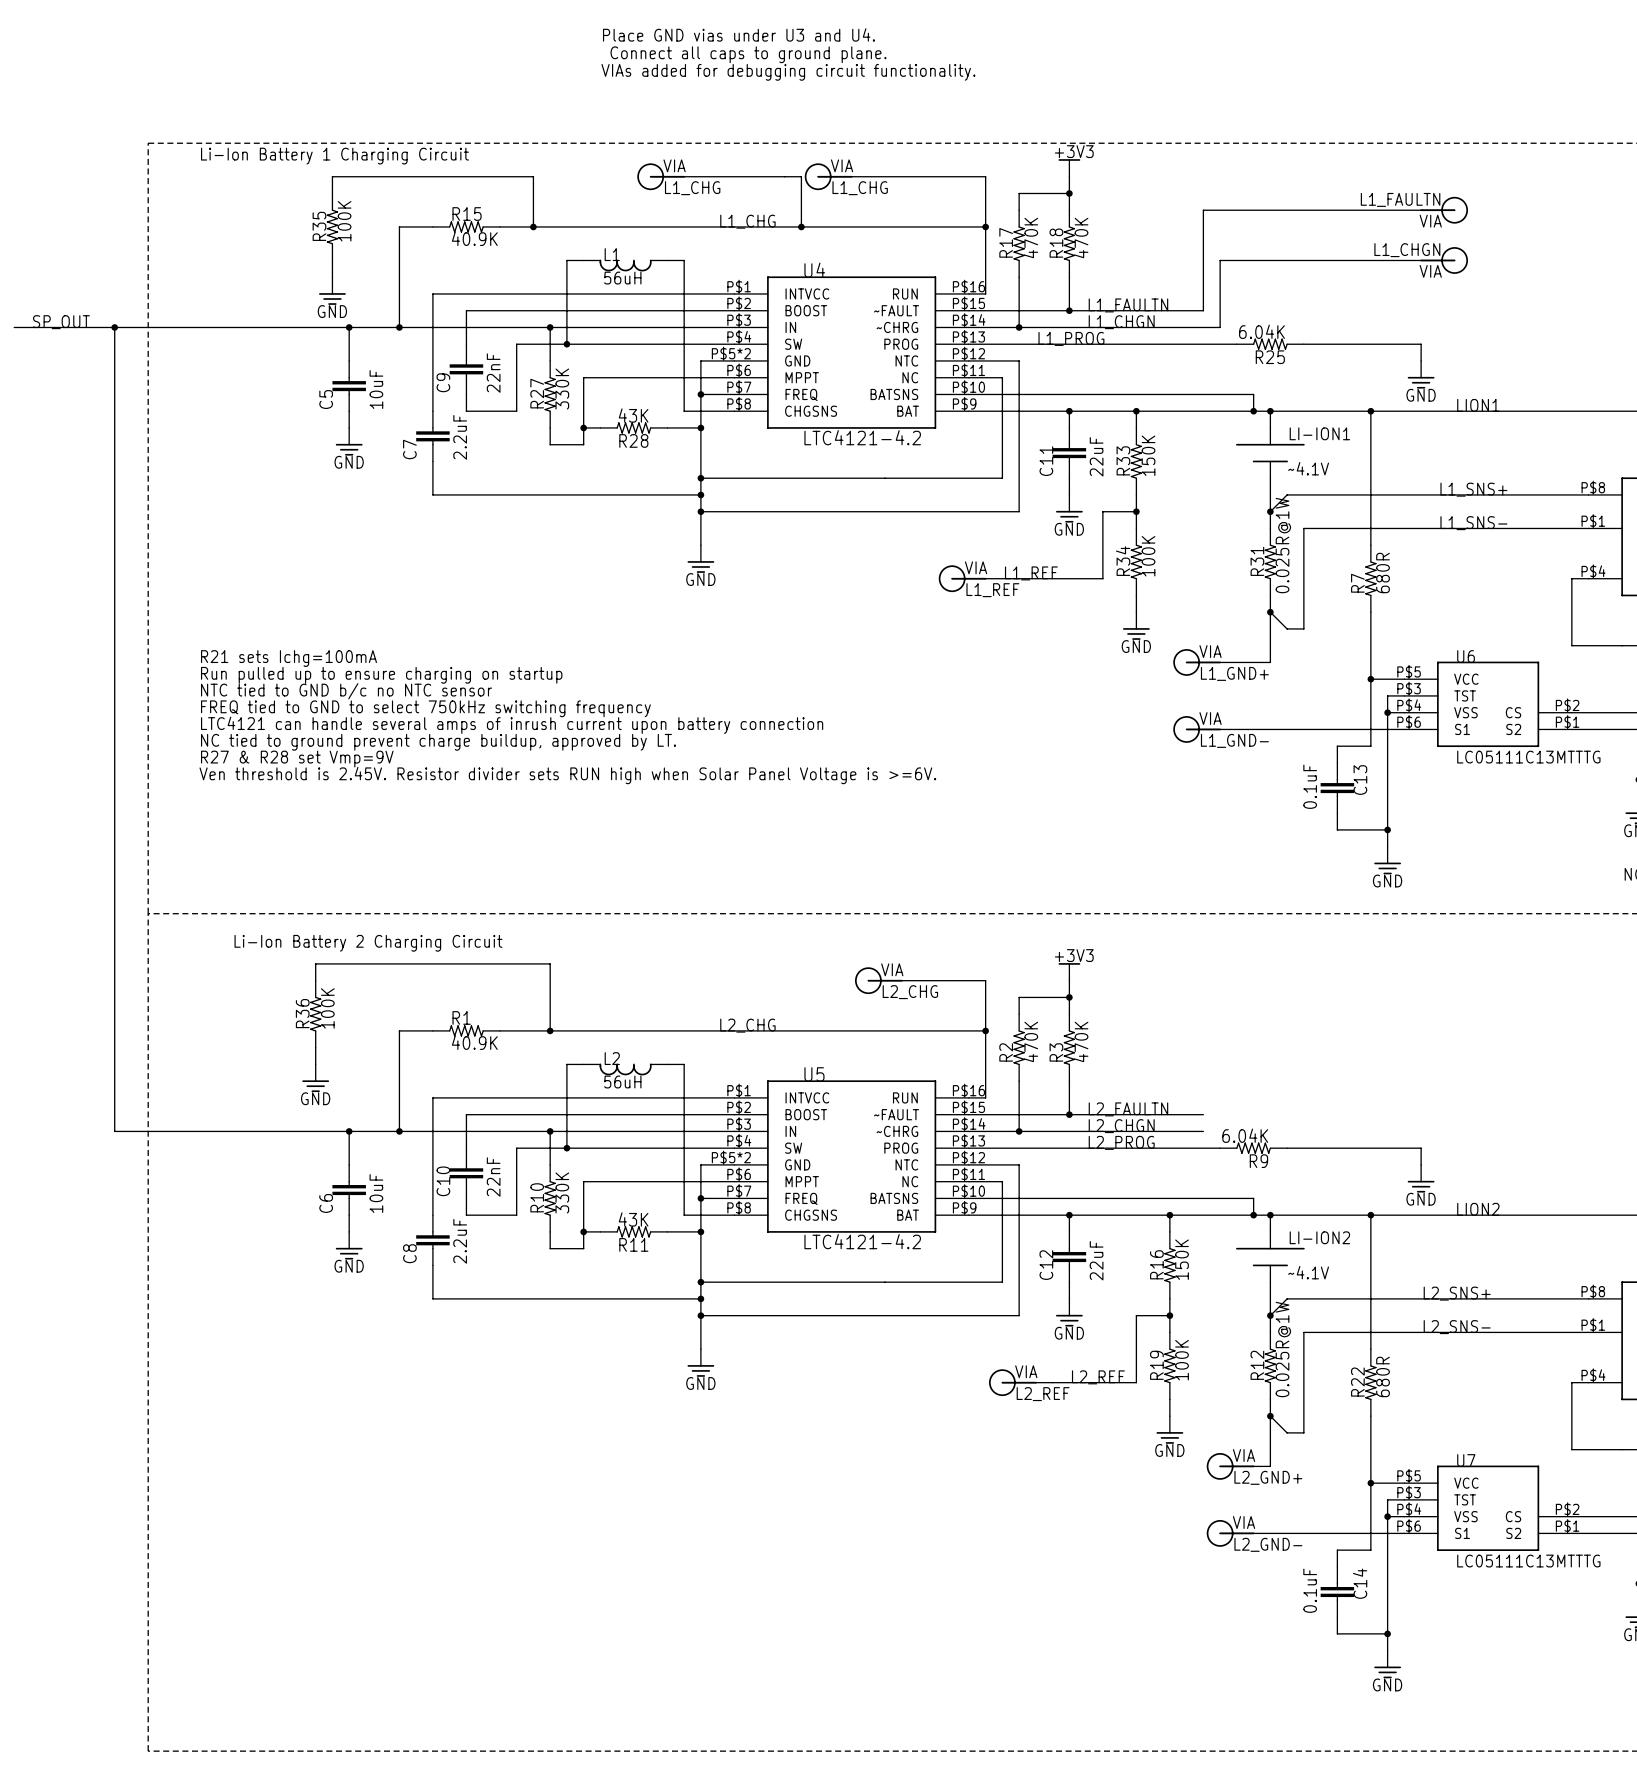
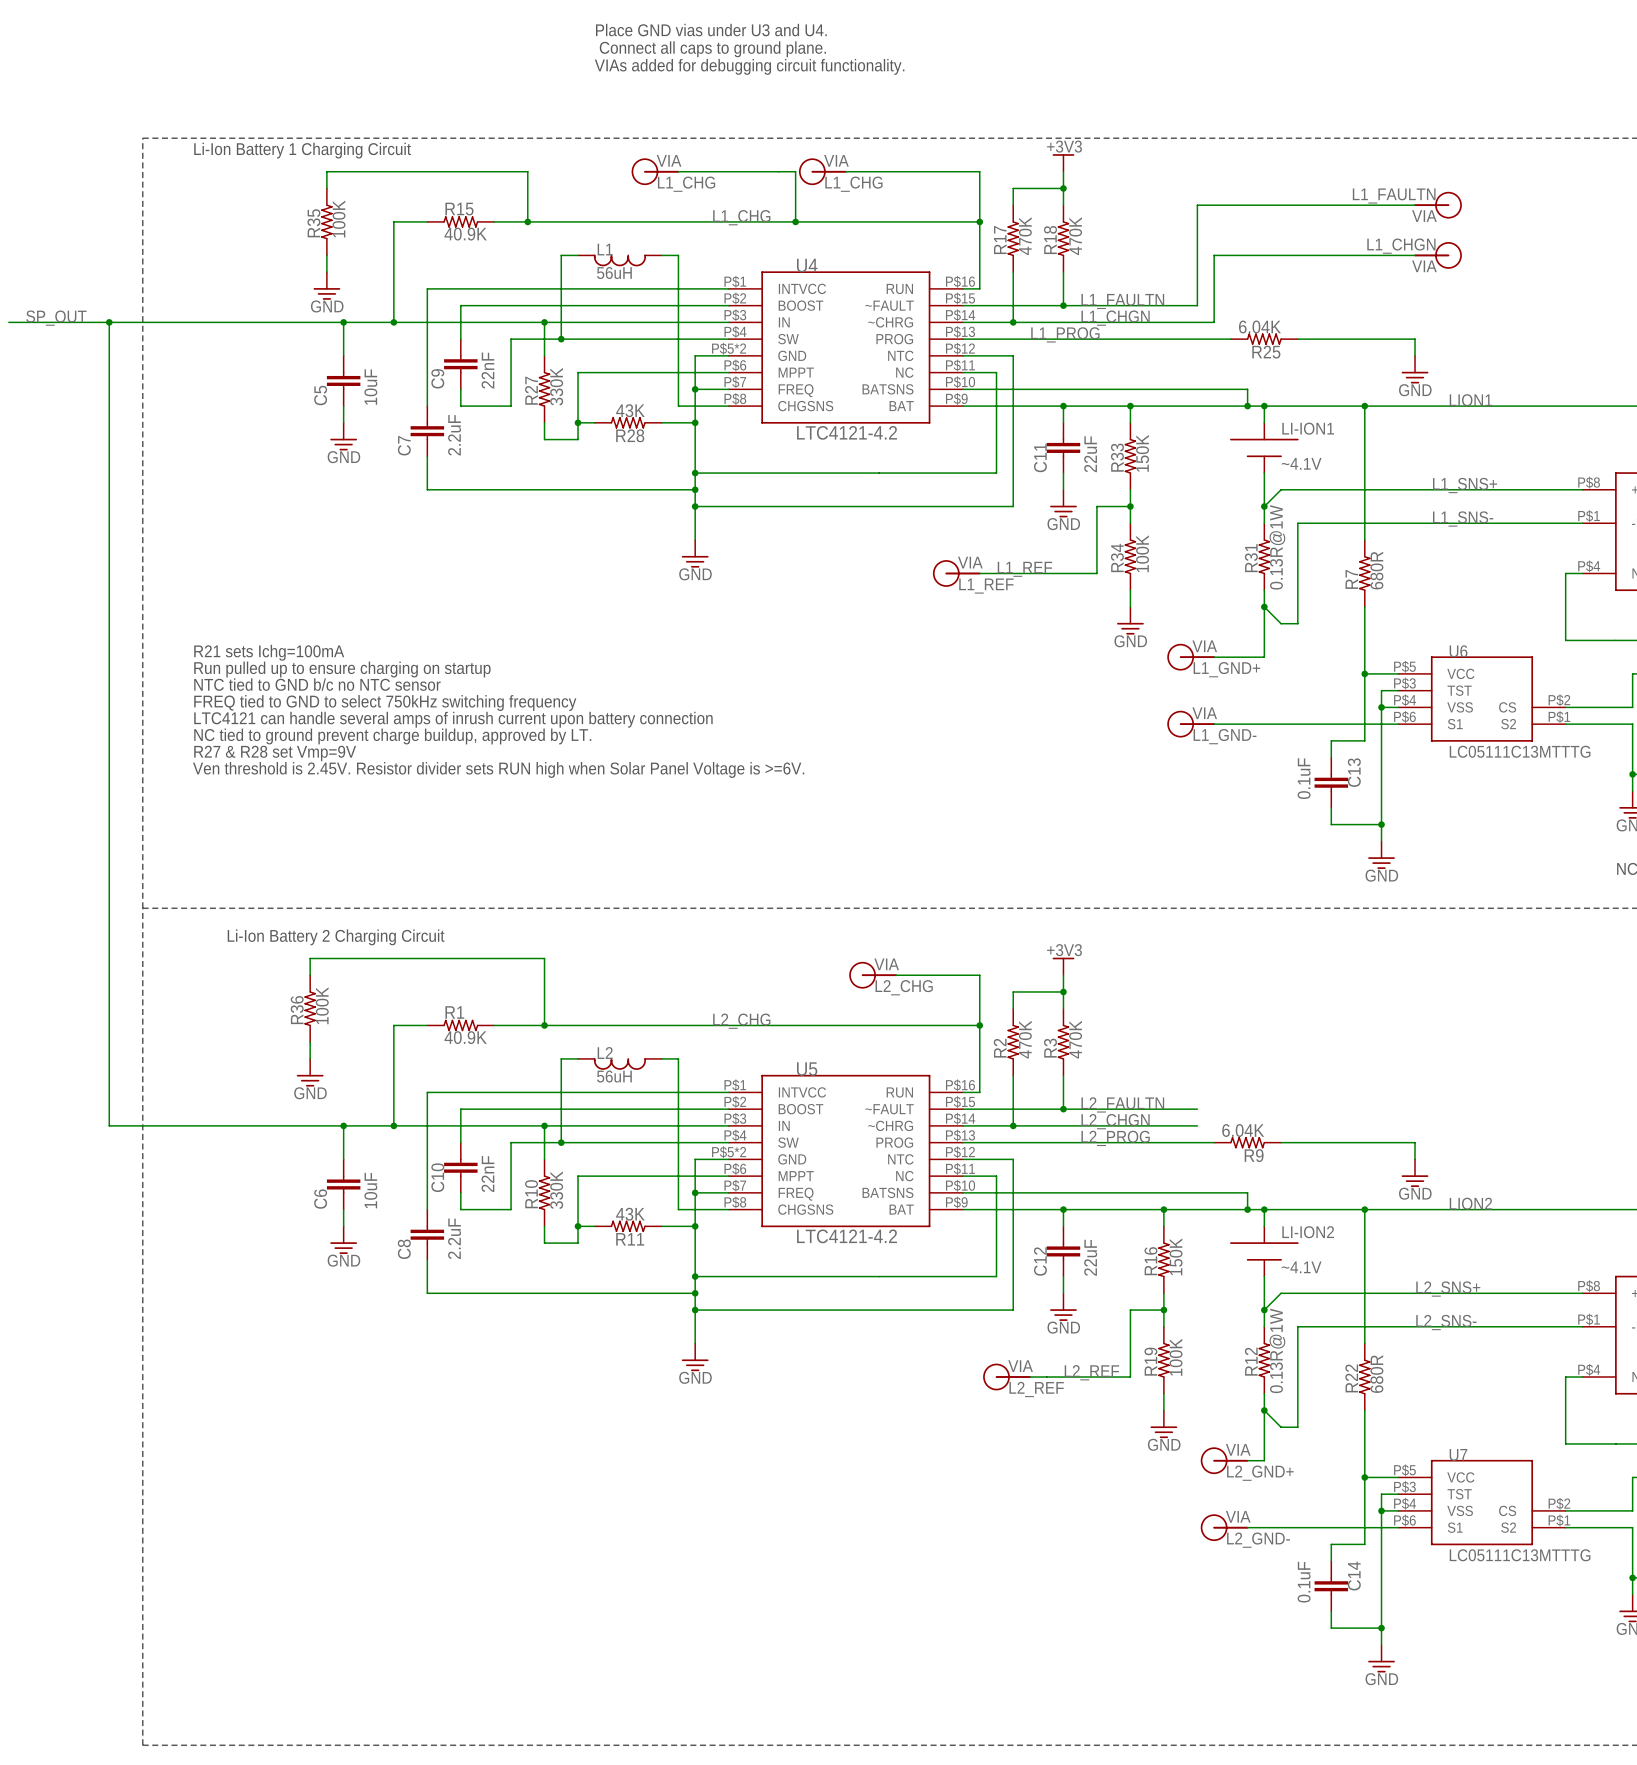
R31 value: 0.025R@1W (1283, 545) -> 0.13R@1W (1277, 547)
R12 value: 0.025R@1W (1283, 1349) -> 0.13R@1W (1277, 1350)

